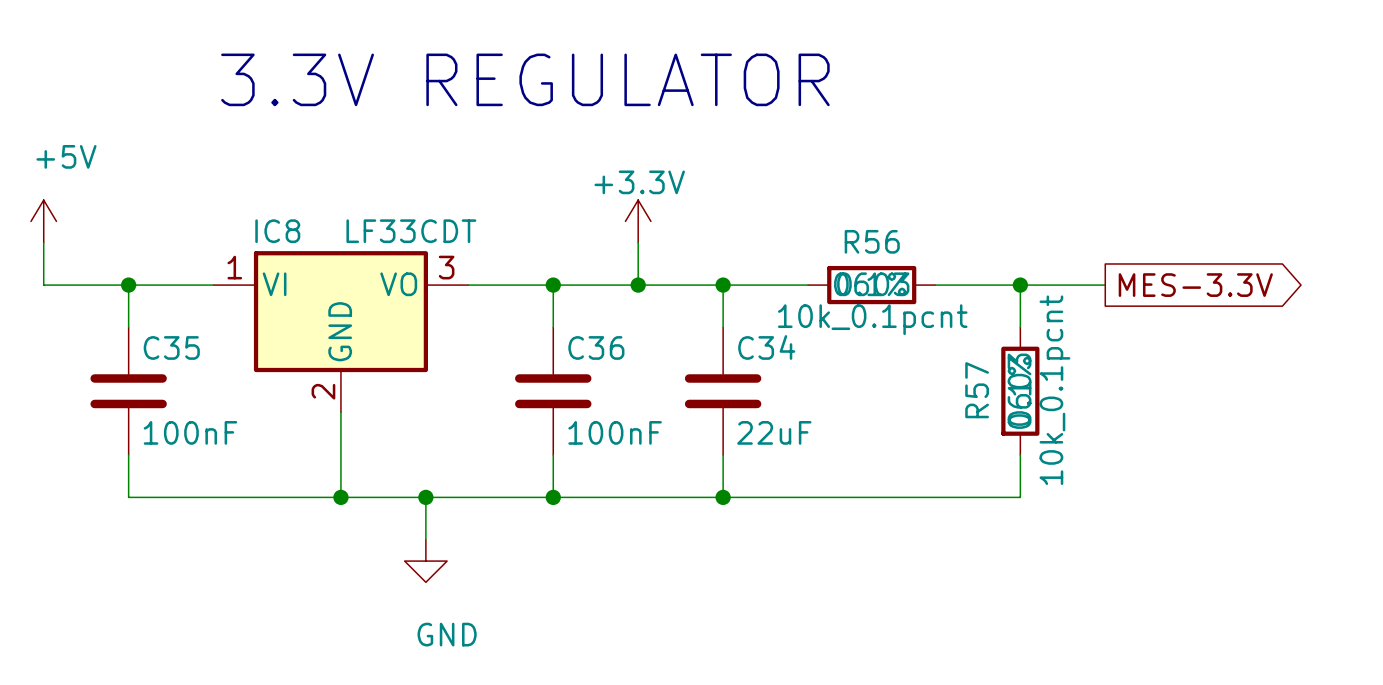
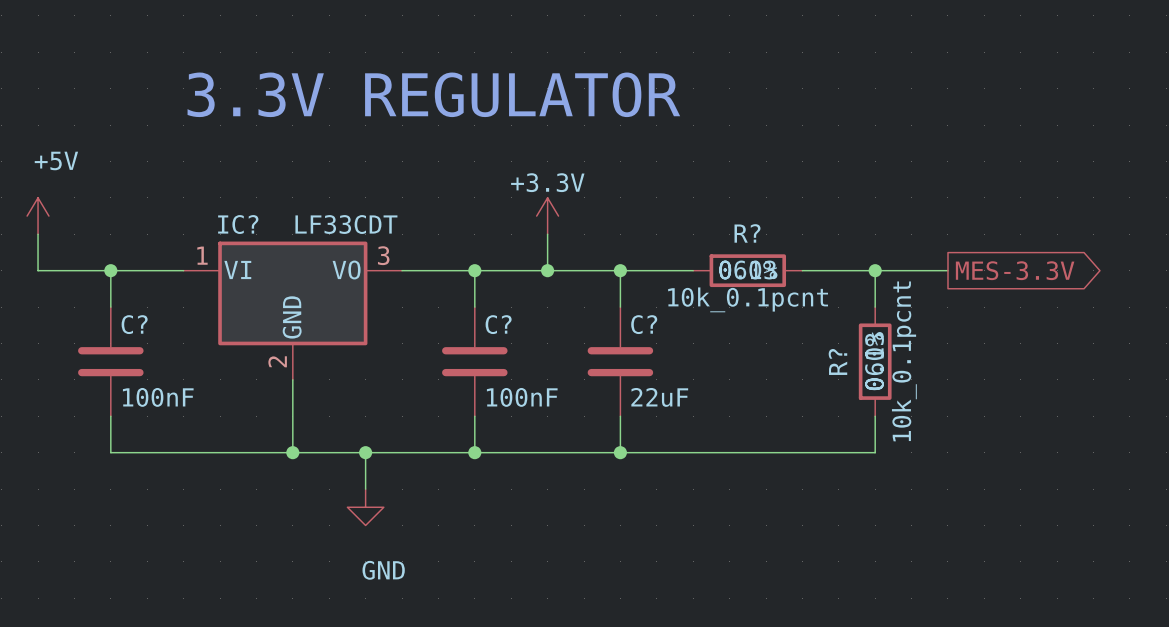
IC8 name: IC8 (277, 231) -> IC? (238, 224)
R56 name: R56 (872, 241) -> R? (747, 233)
C35 name: C35 (171, 347) -> C? (134, 324)
C36 name: C36 (596, 347) -> C? (498, 324)
C34 name: C34 (766, 347) -> C? (644, 324)
R57 name: R57 (977, 390) -> R? (837, 361)

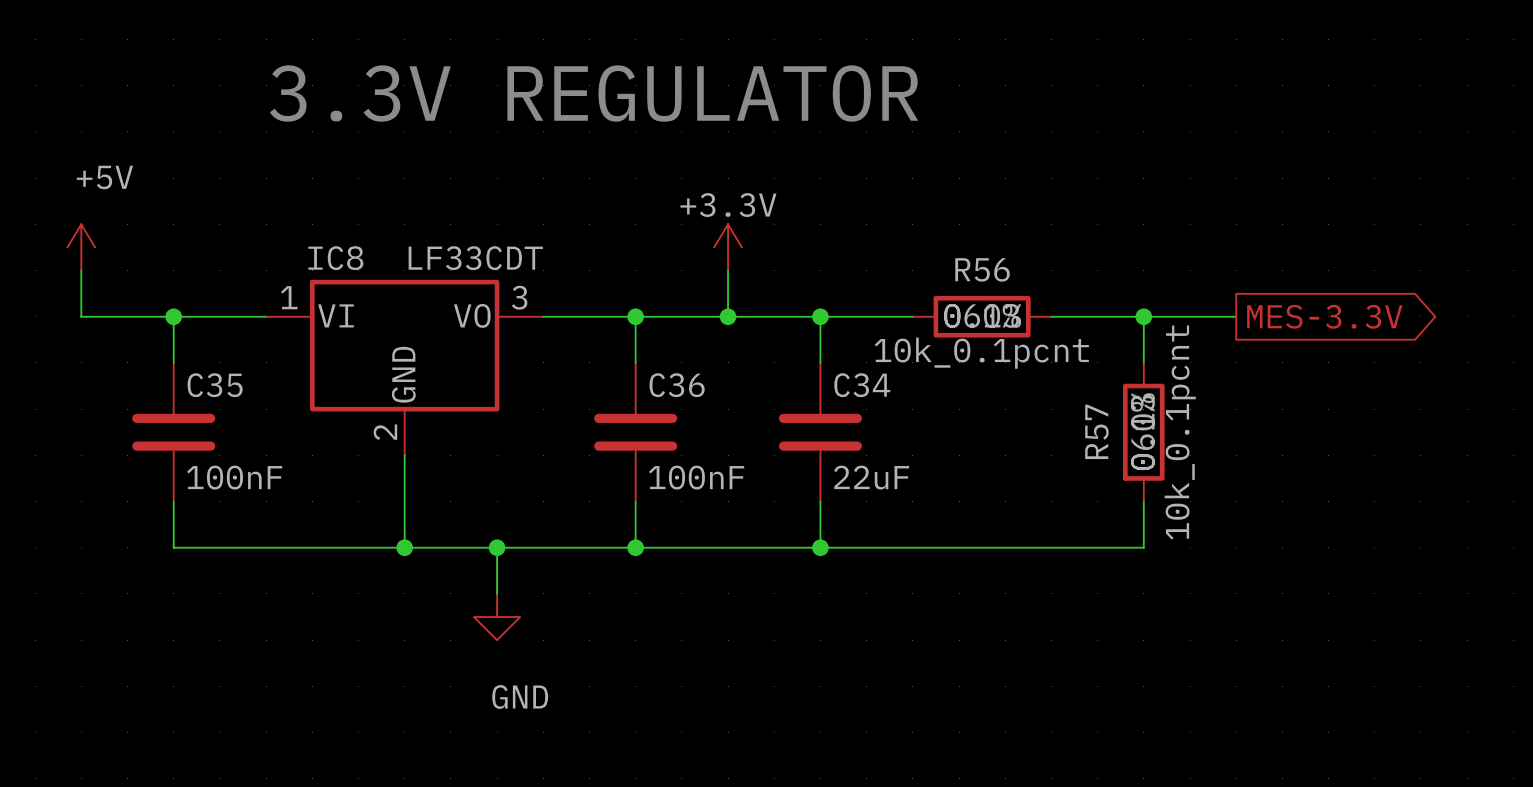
IC? name: IC? (238, 224) -> IC8 (335, 258)
R? name: R? (747, 233) -> R56 (982, 269)
C? name: C? (134, 324) -> C35 (215, 385)
C? name: C? (498, 324) -> C36 (677, 385)
C? name: C? (644, 324) -> C34 (862, 385)
R? name: R? (837, 361) -> R57 (1096, 431)

